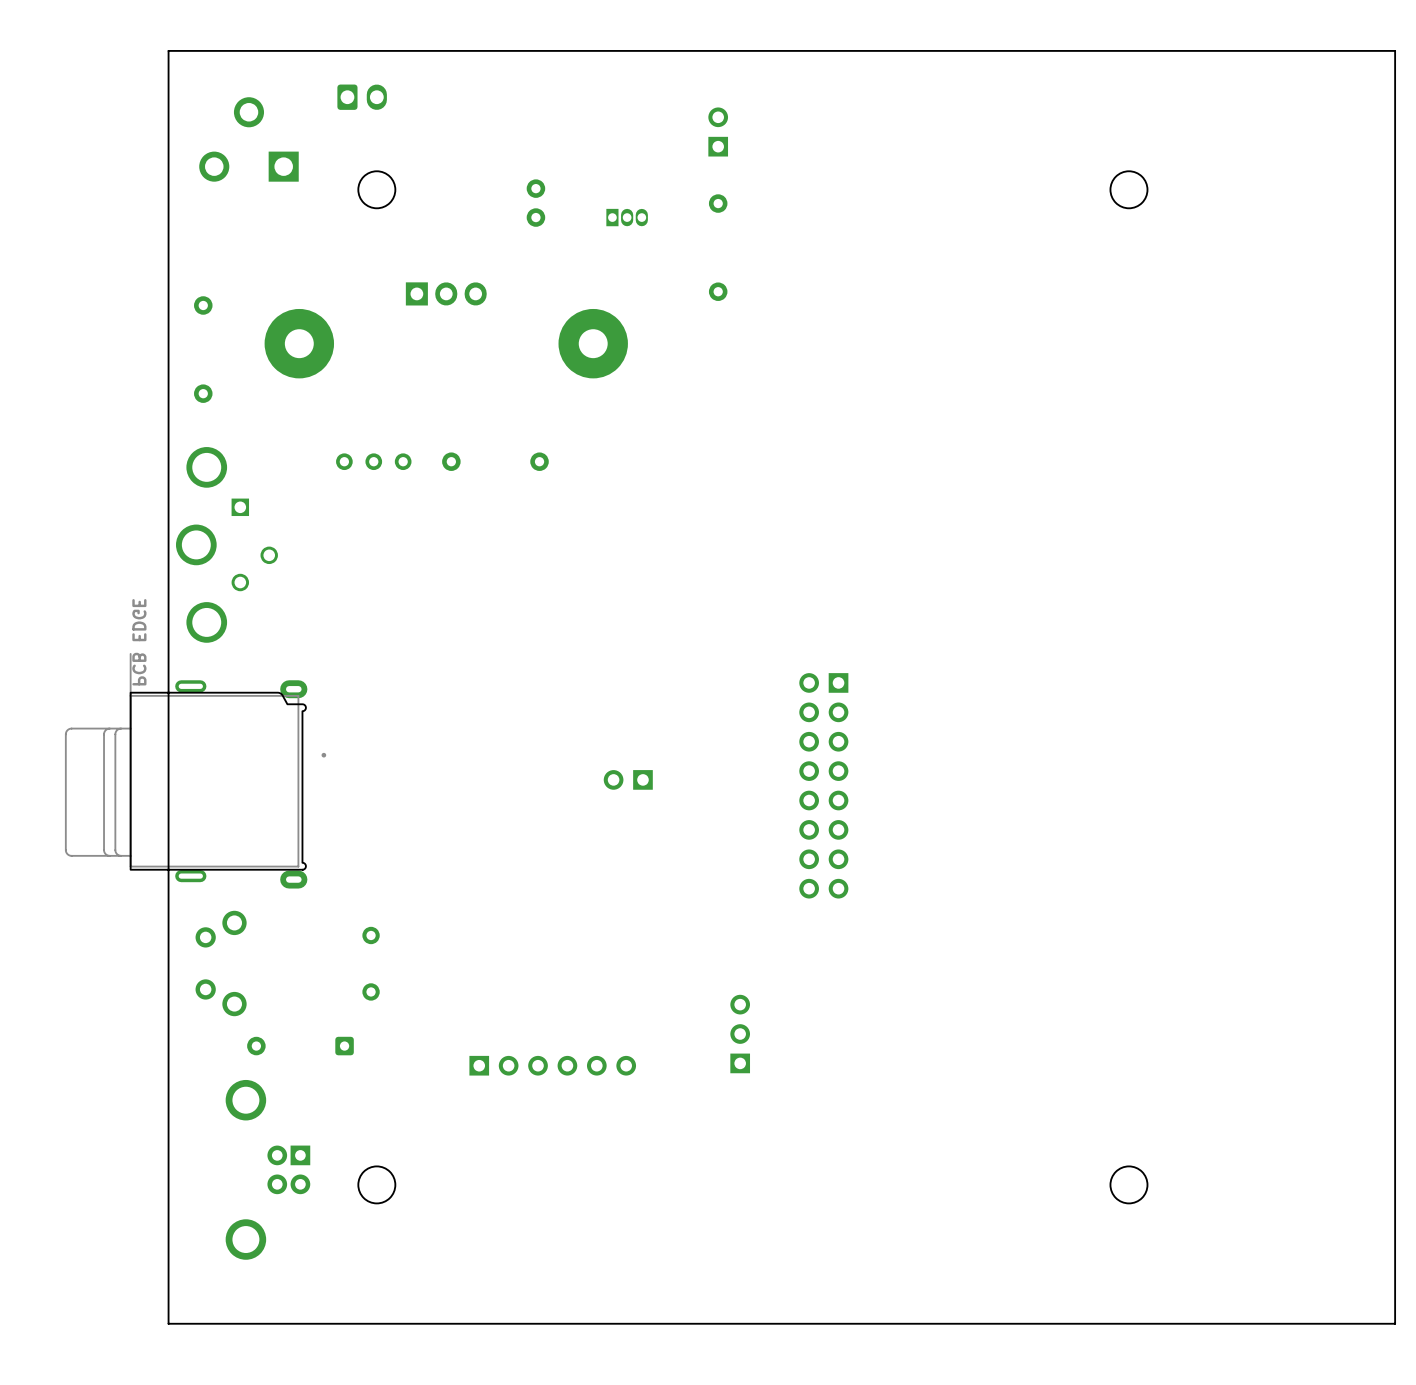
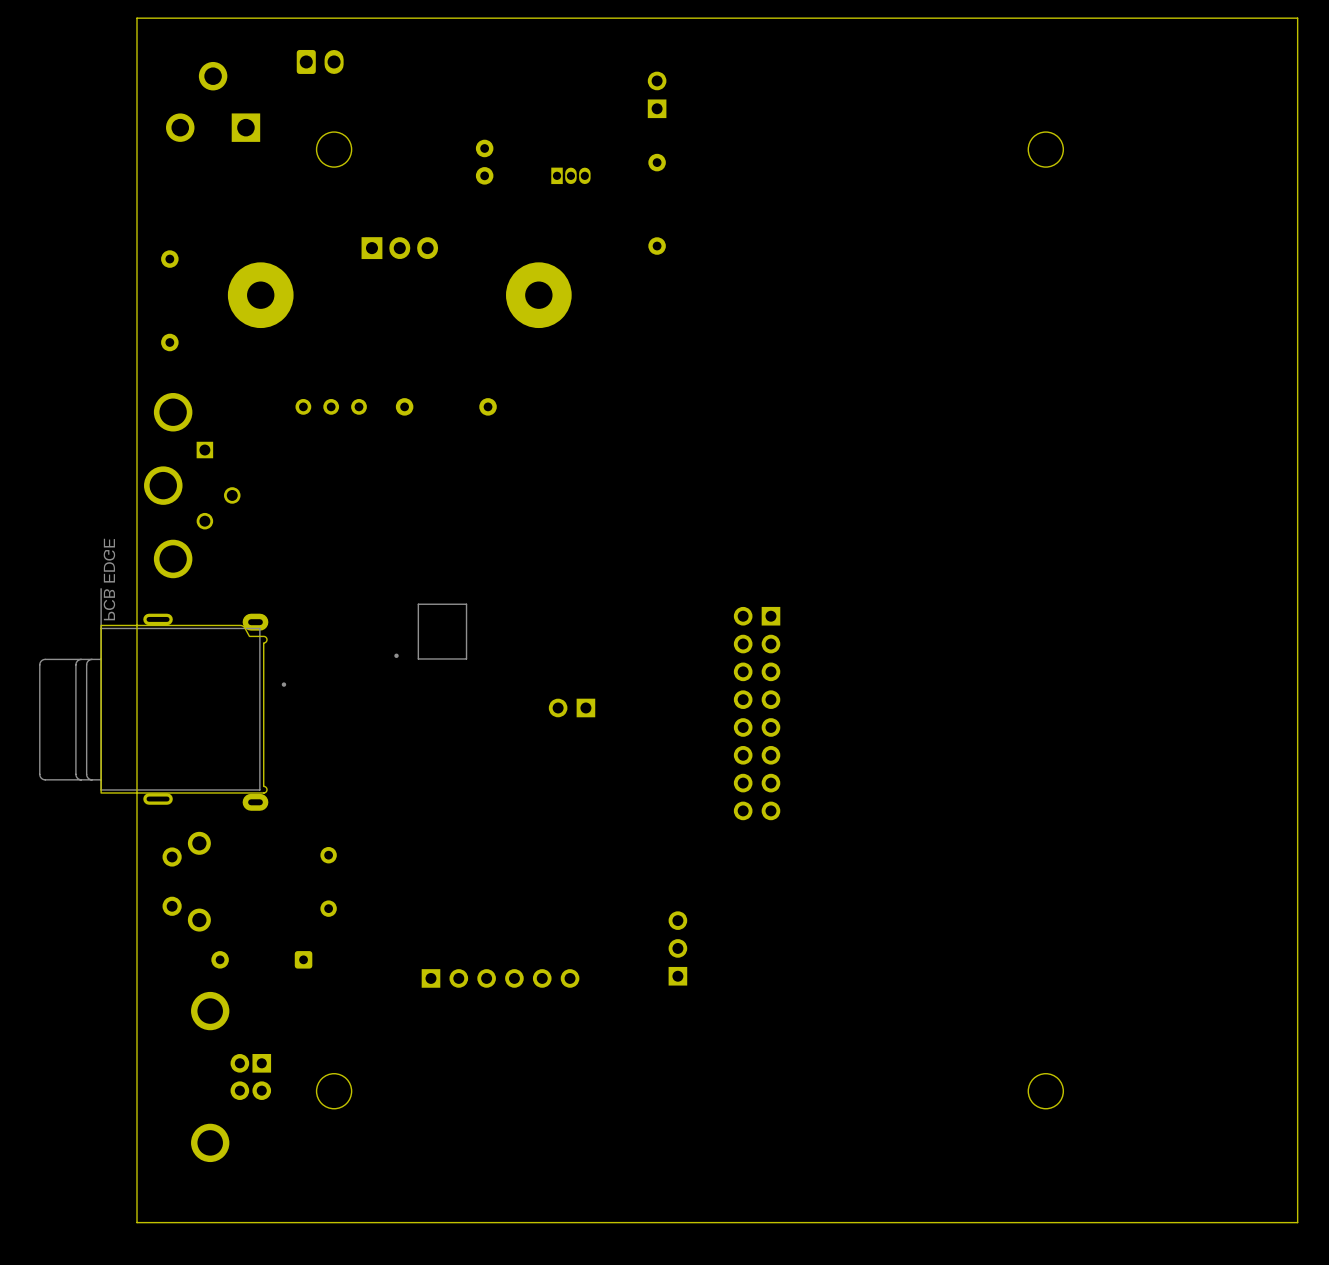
part: none -> (430, 631)

